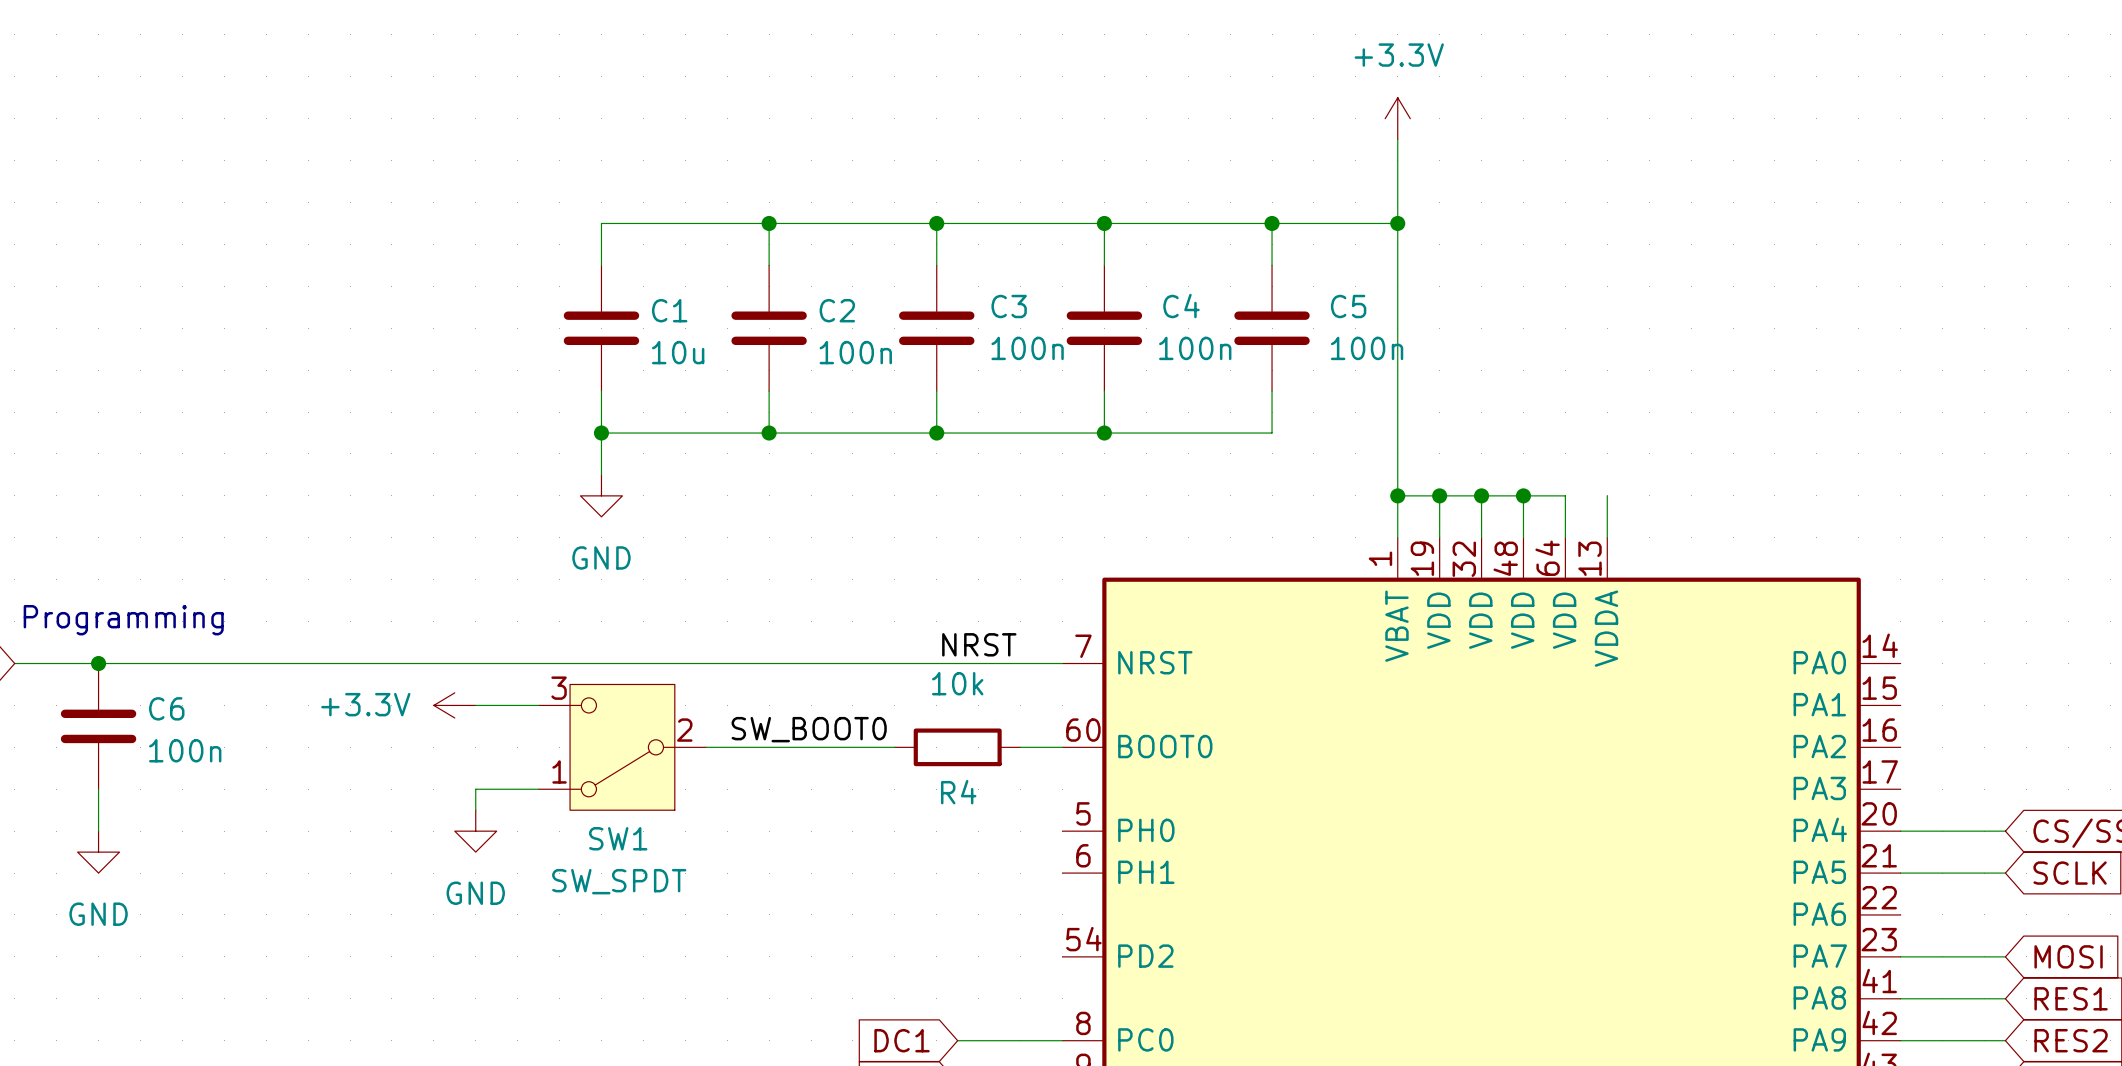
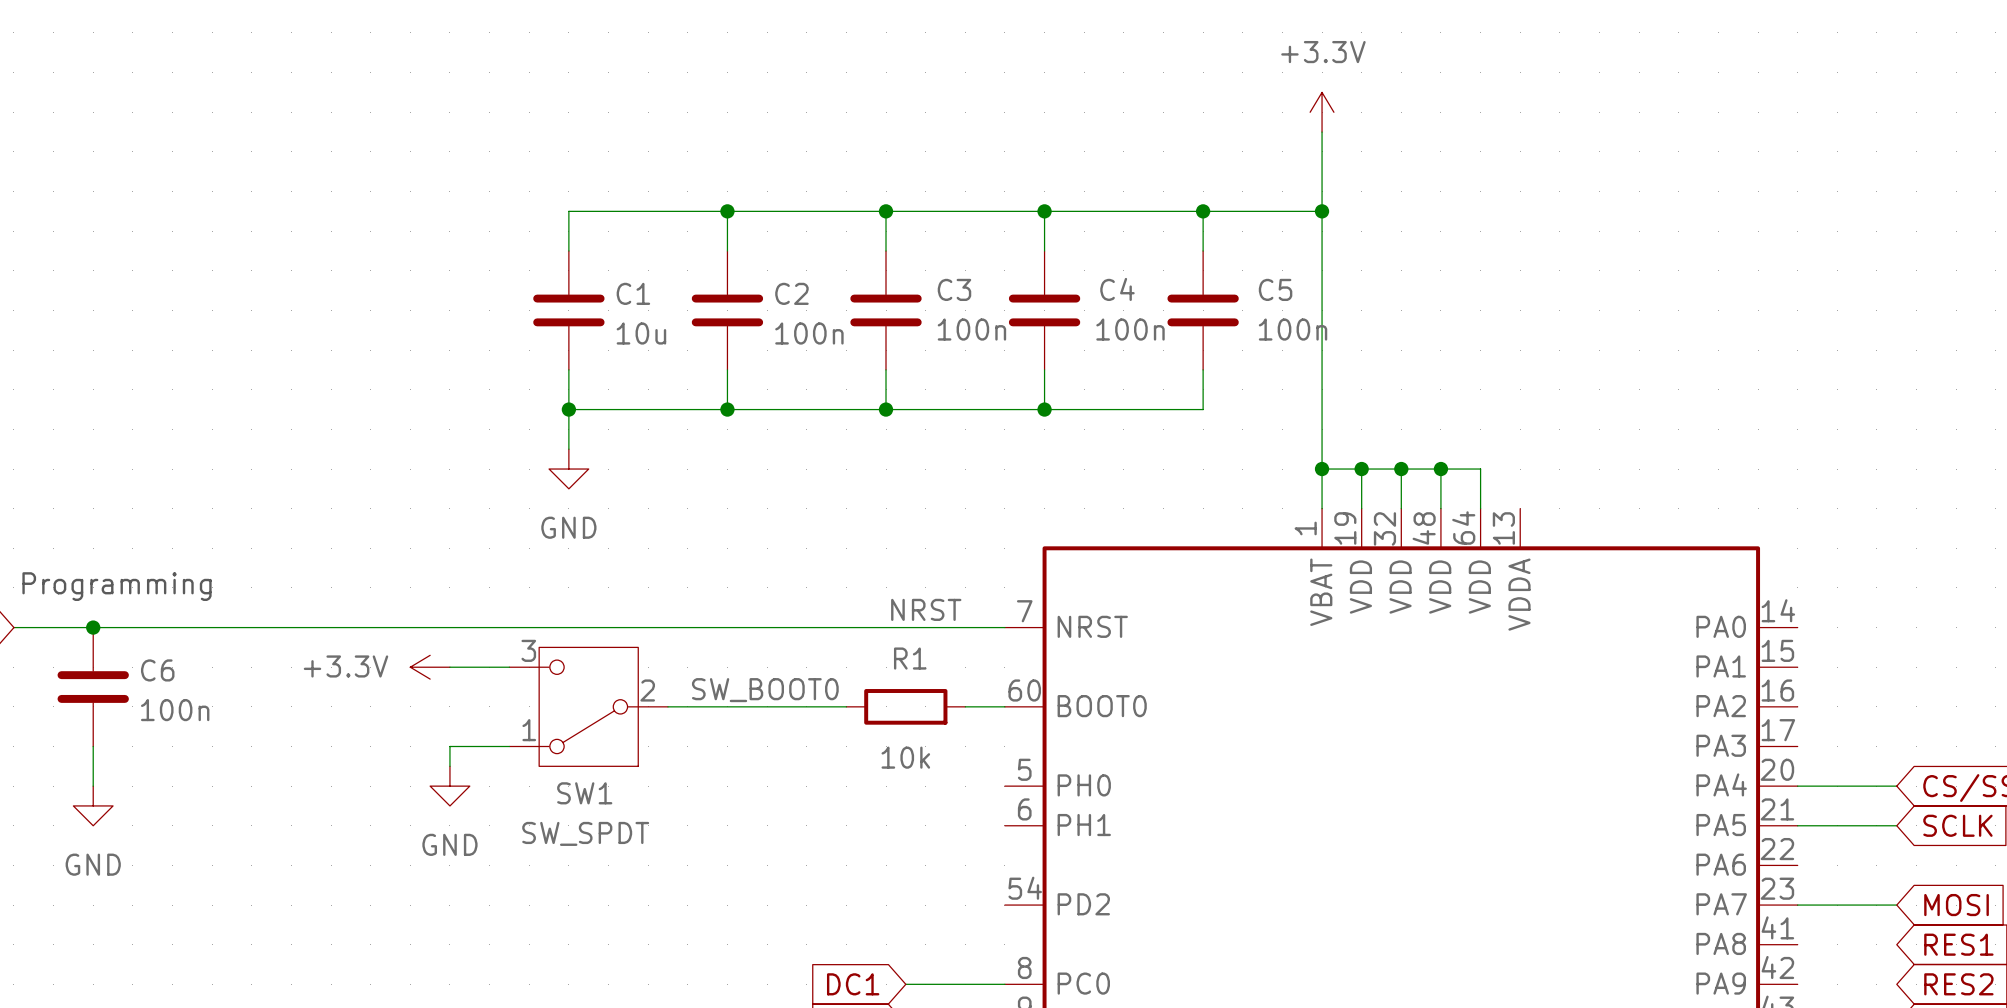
wire: (1607, 495) (1607, 537) -> none
R4 value position: 10k (957, 683) -> 10k (905, 757)
R4 name: R4 (958, 792) -> R1 (910, 658)
wire: (1900, 998) (2005, 998) -> none
wire: (1900, 1040) (2005, 1040) -> none

